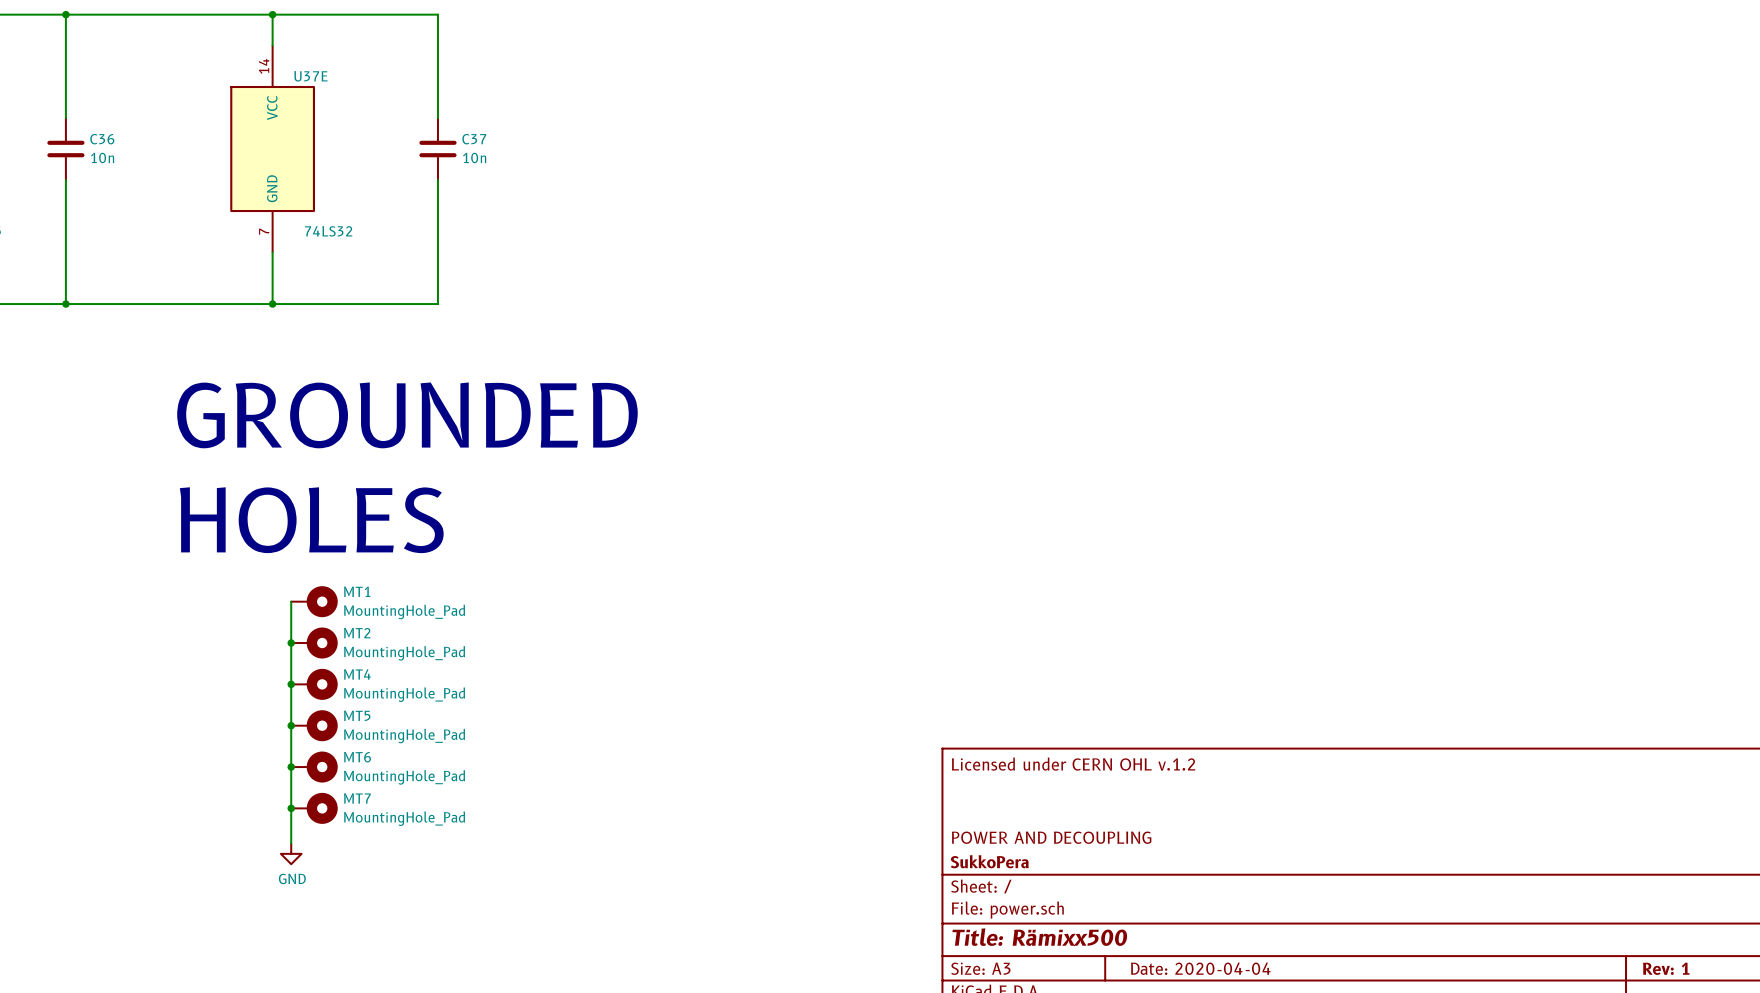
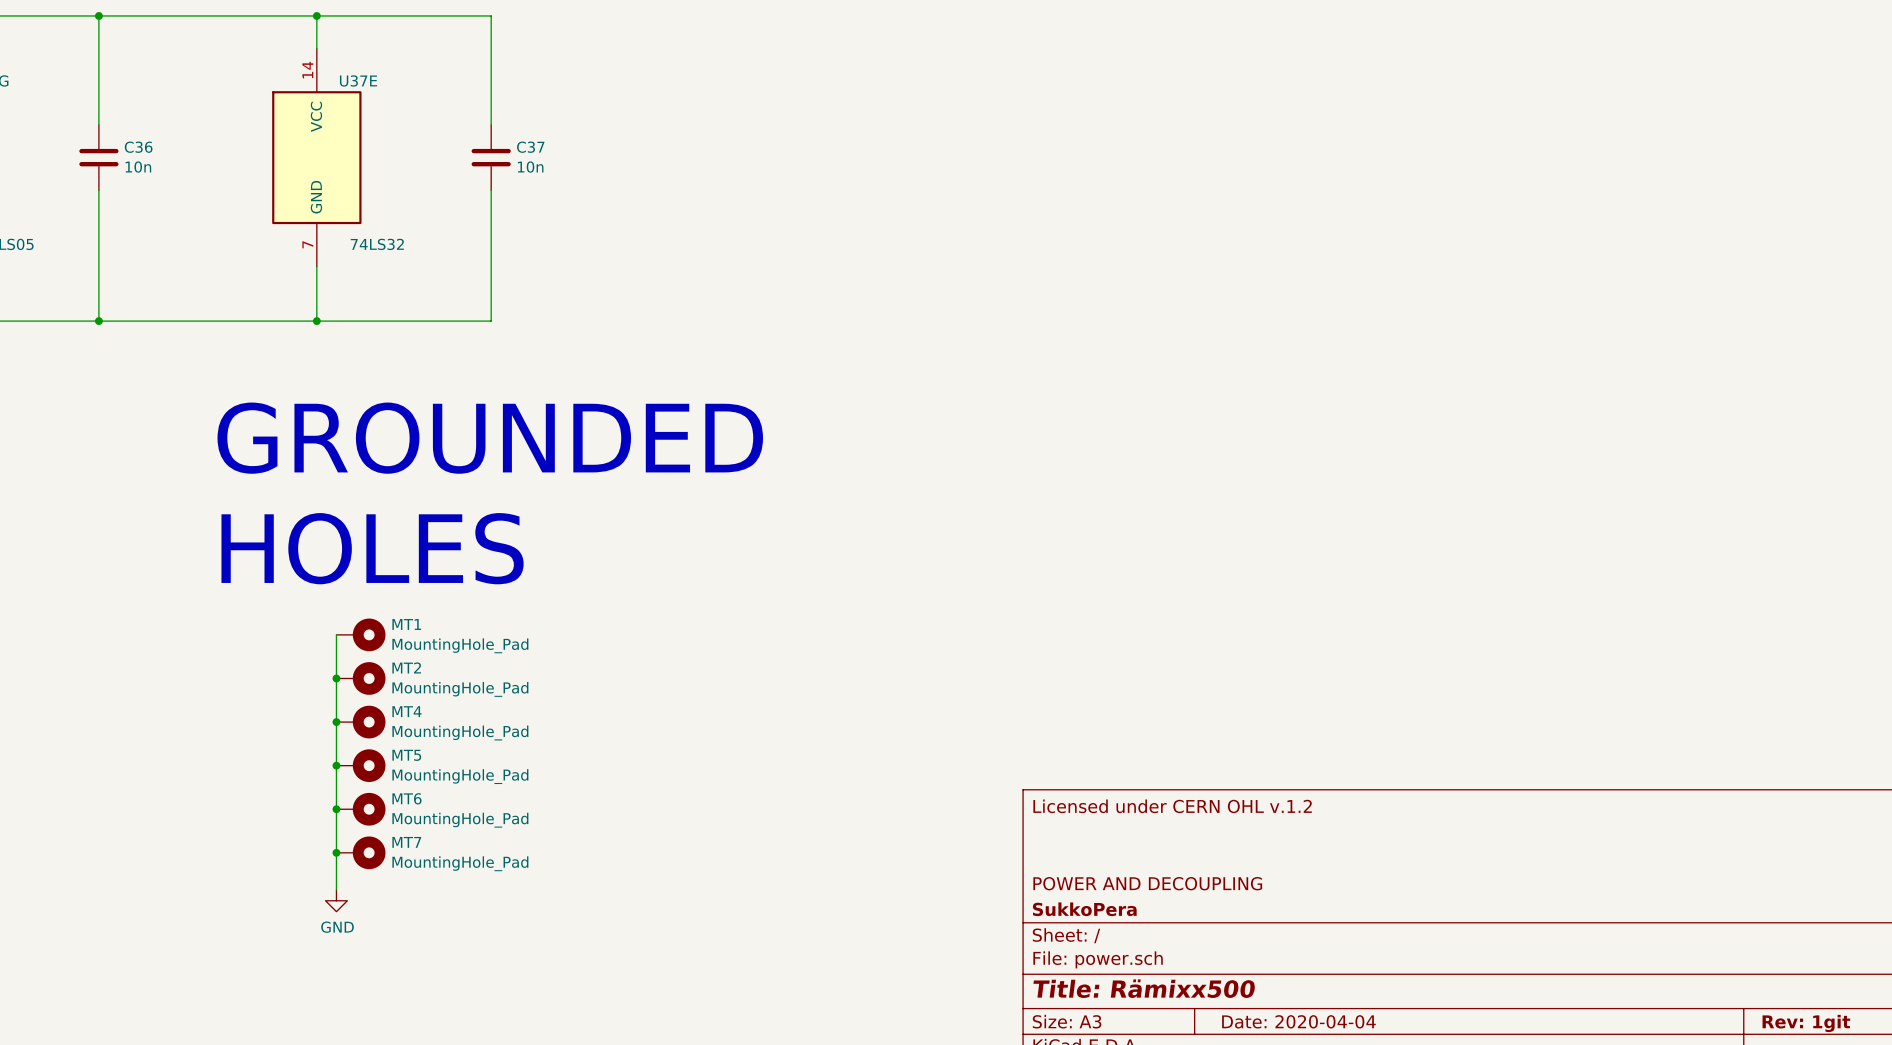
title block: Rev: 1 (1666, 968) -> Rev: 1git (1806, 1023)

